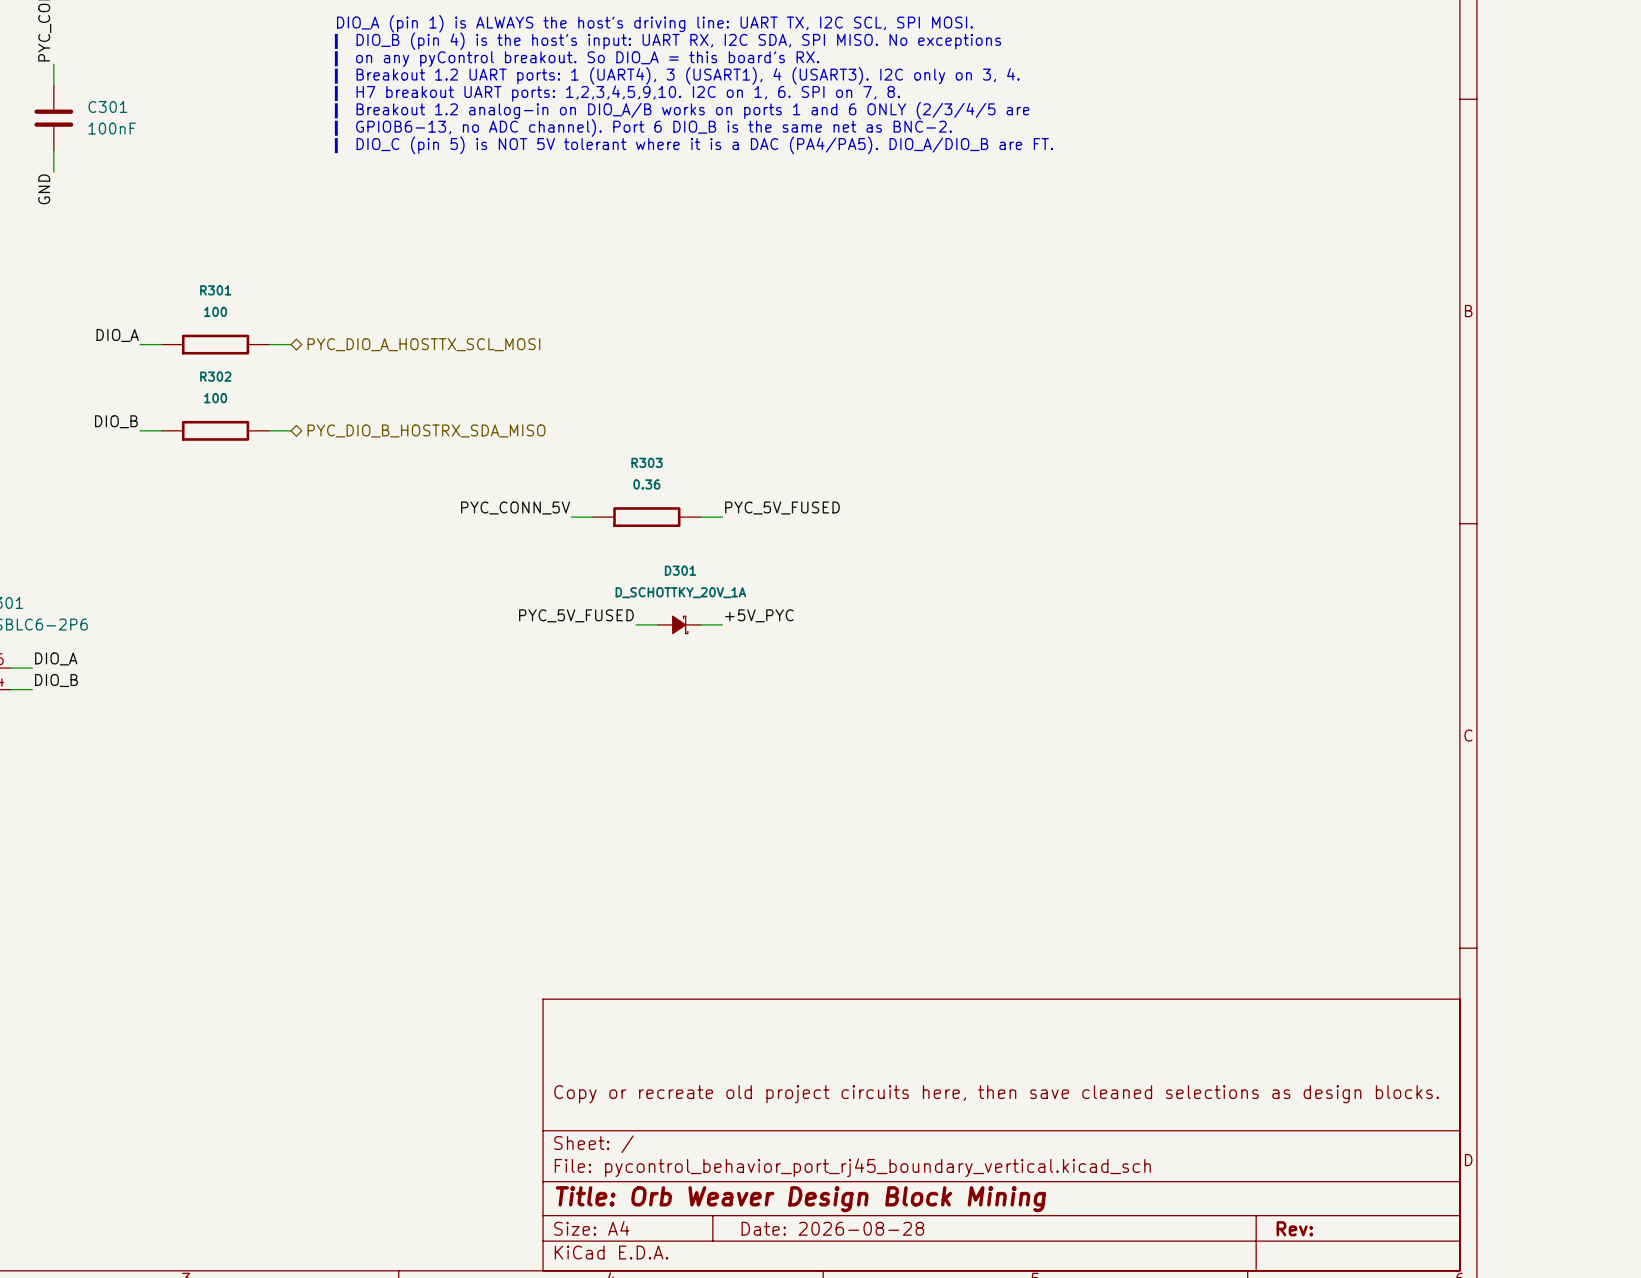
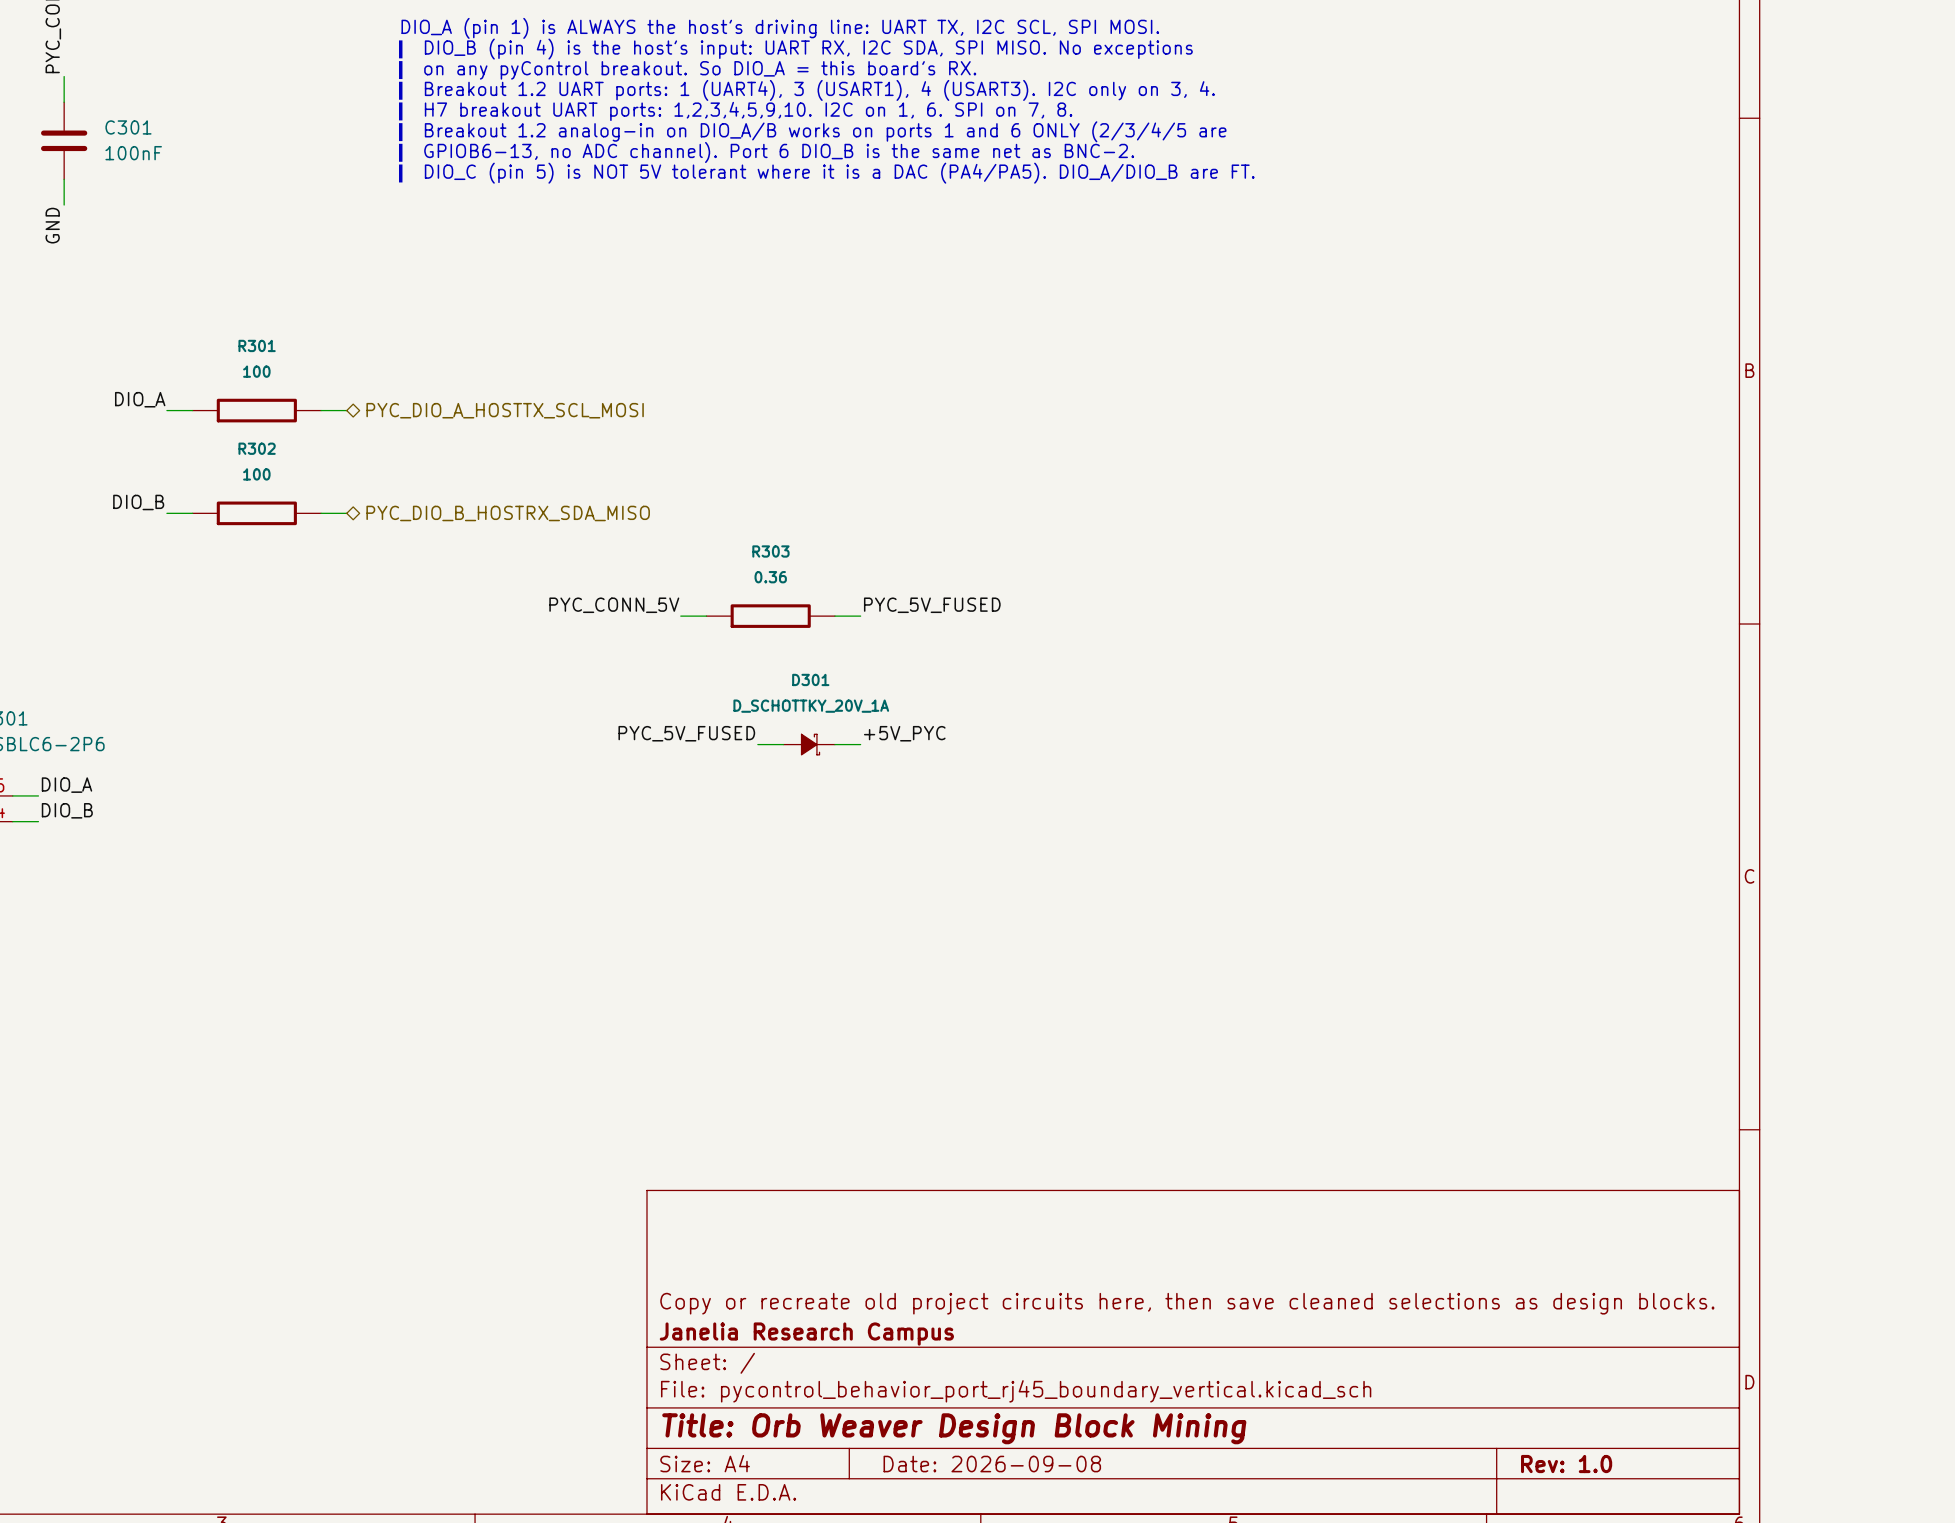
title block: none -> Janelia Research Campus (806, 1334)
title block: Date: 2026-08-28 (832, 1228) -> Date: 2026-09-08 (992, 1464)
title block: Rev: (1294, 1228) -> Rev: 1.0 (1566, 1464)

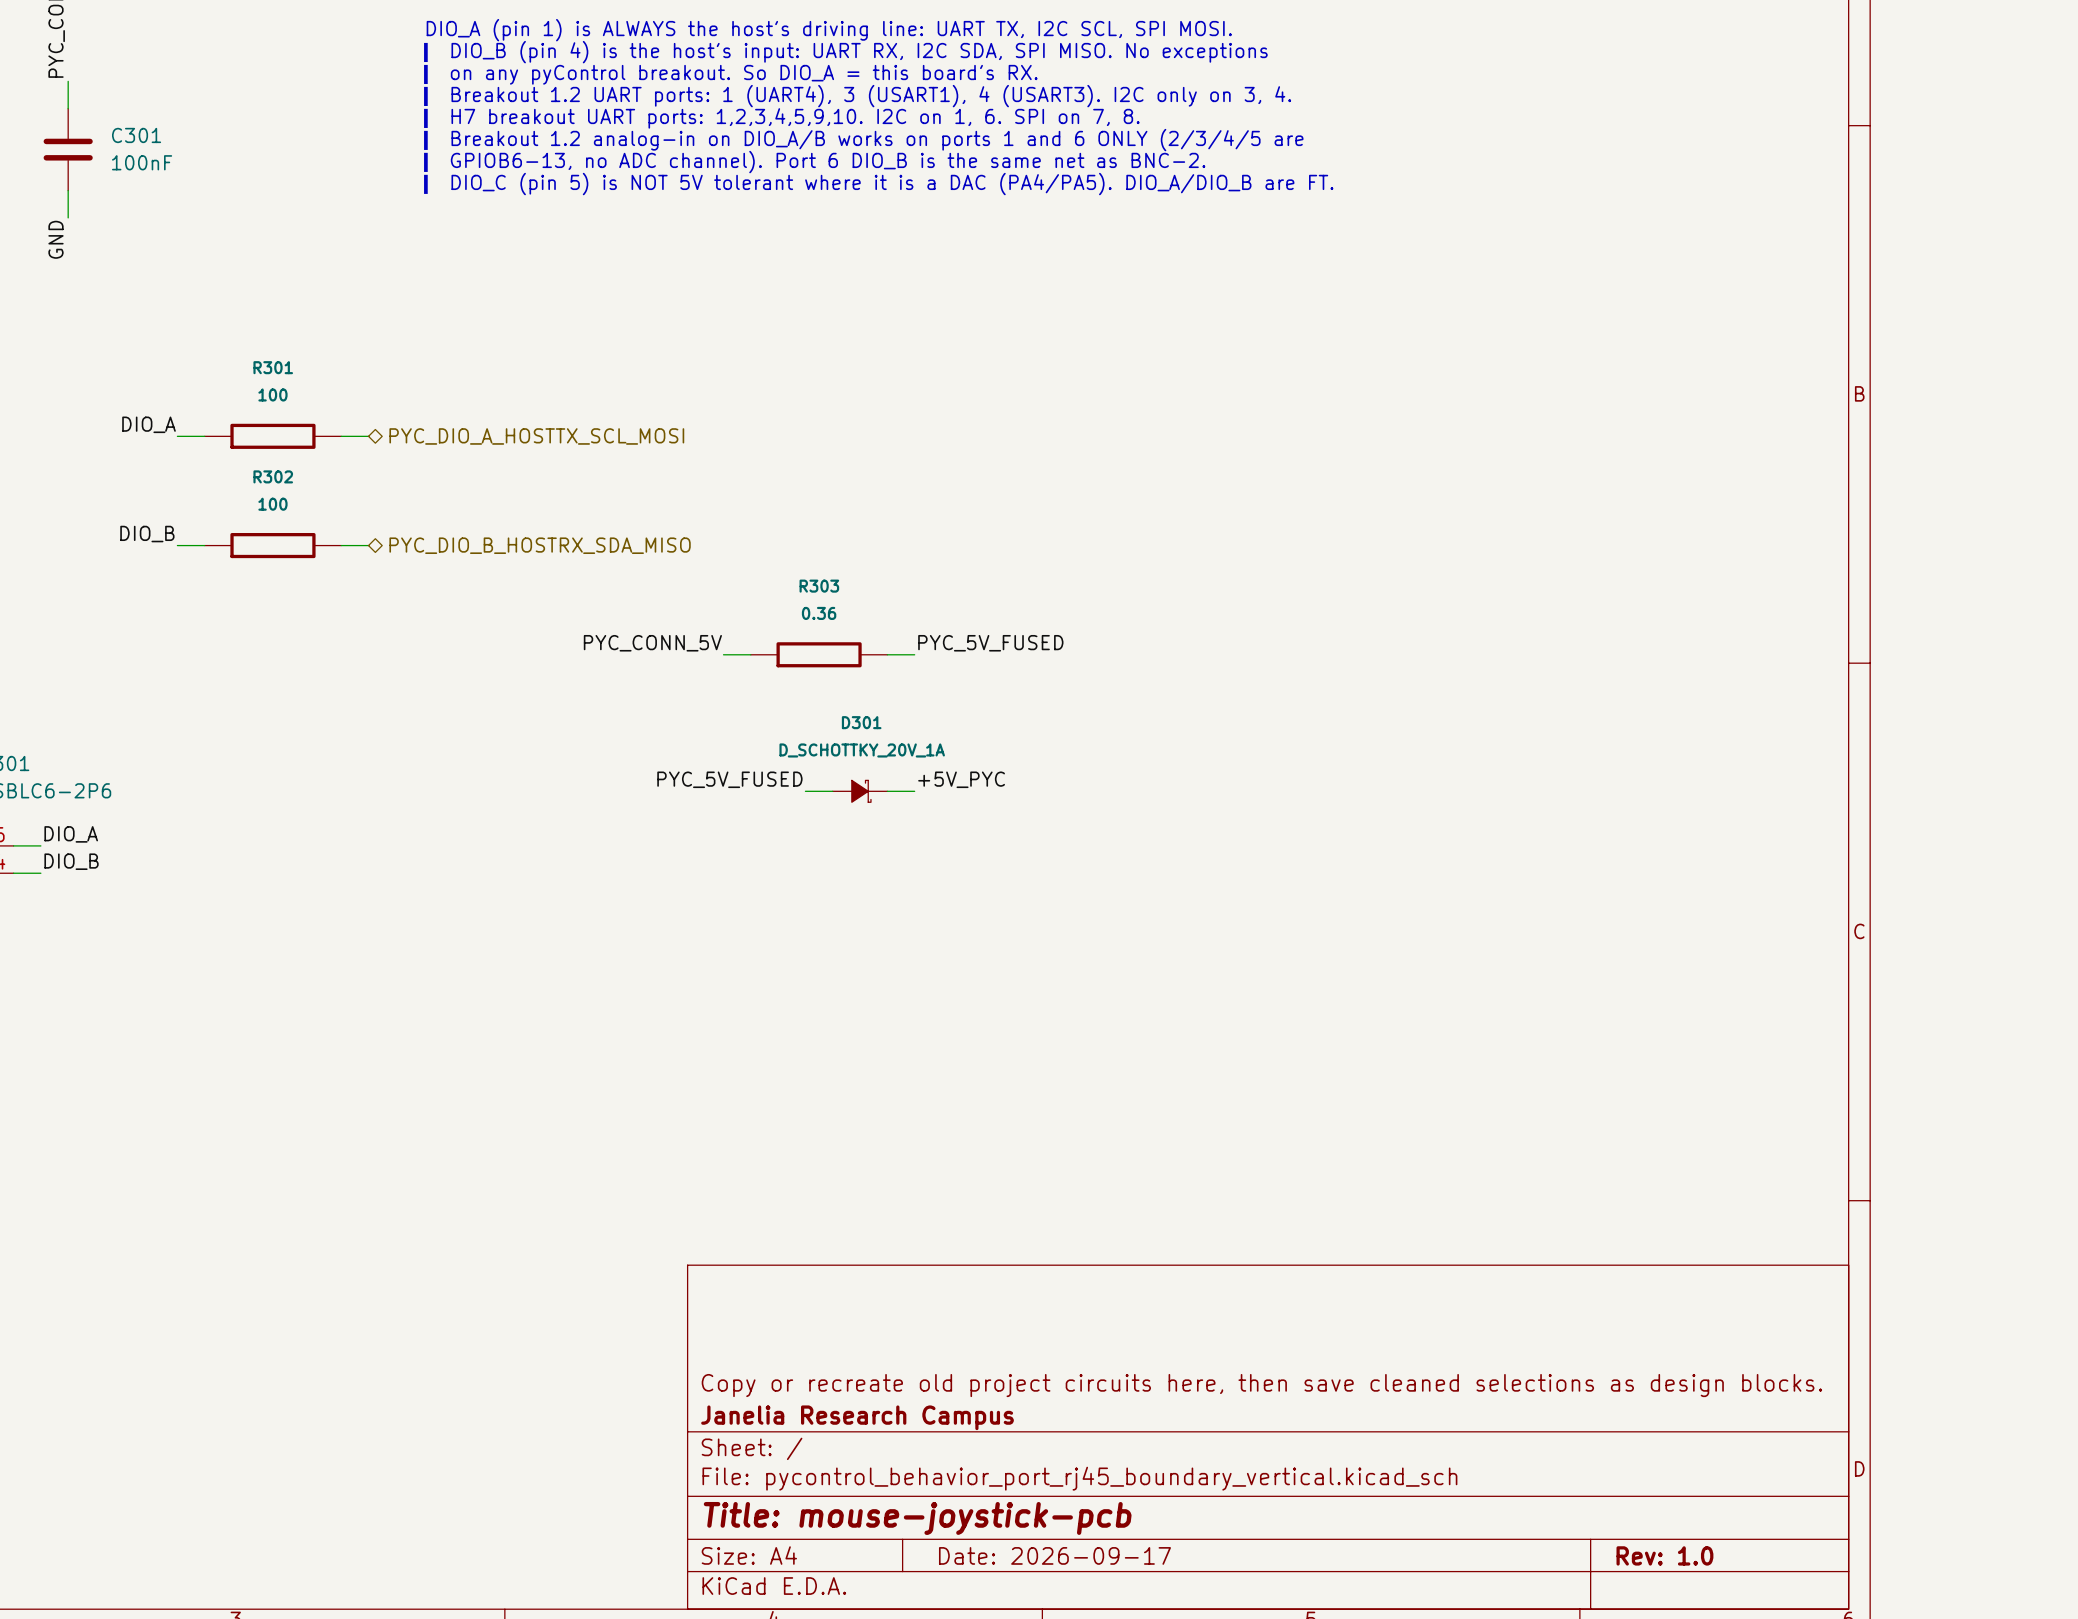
title block: Title: Orb Weaver Design Block Mining (954, 1428) -> Title: mouse-joystick-pcb (917, 1518)
title block: Date: 2026-09-08 (992, 1464) -> Date: 2026-09-17 (1054, 1555)

